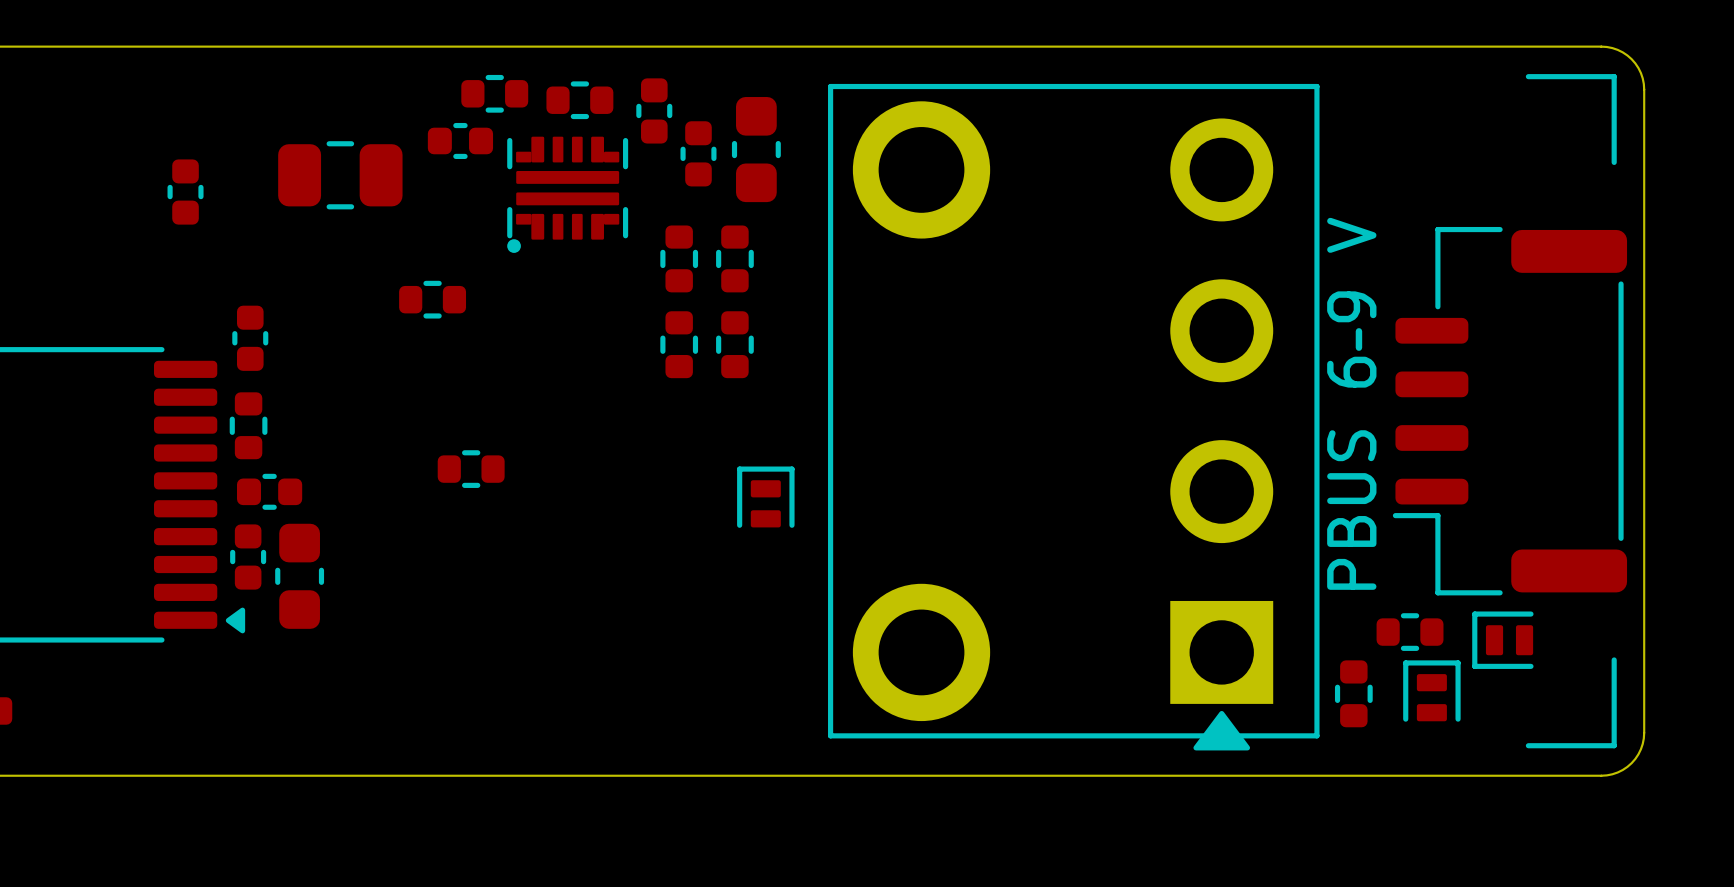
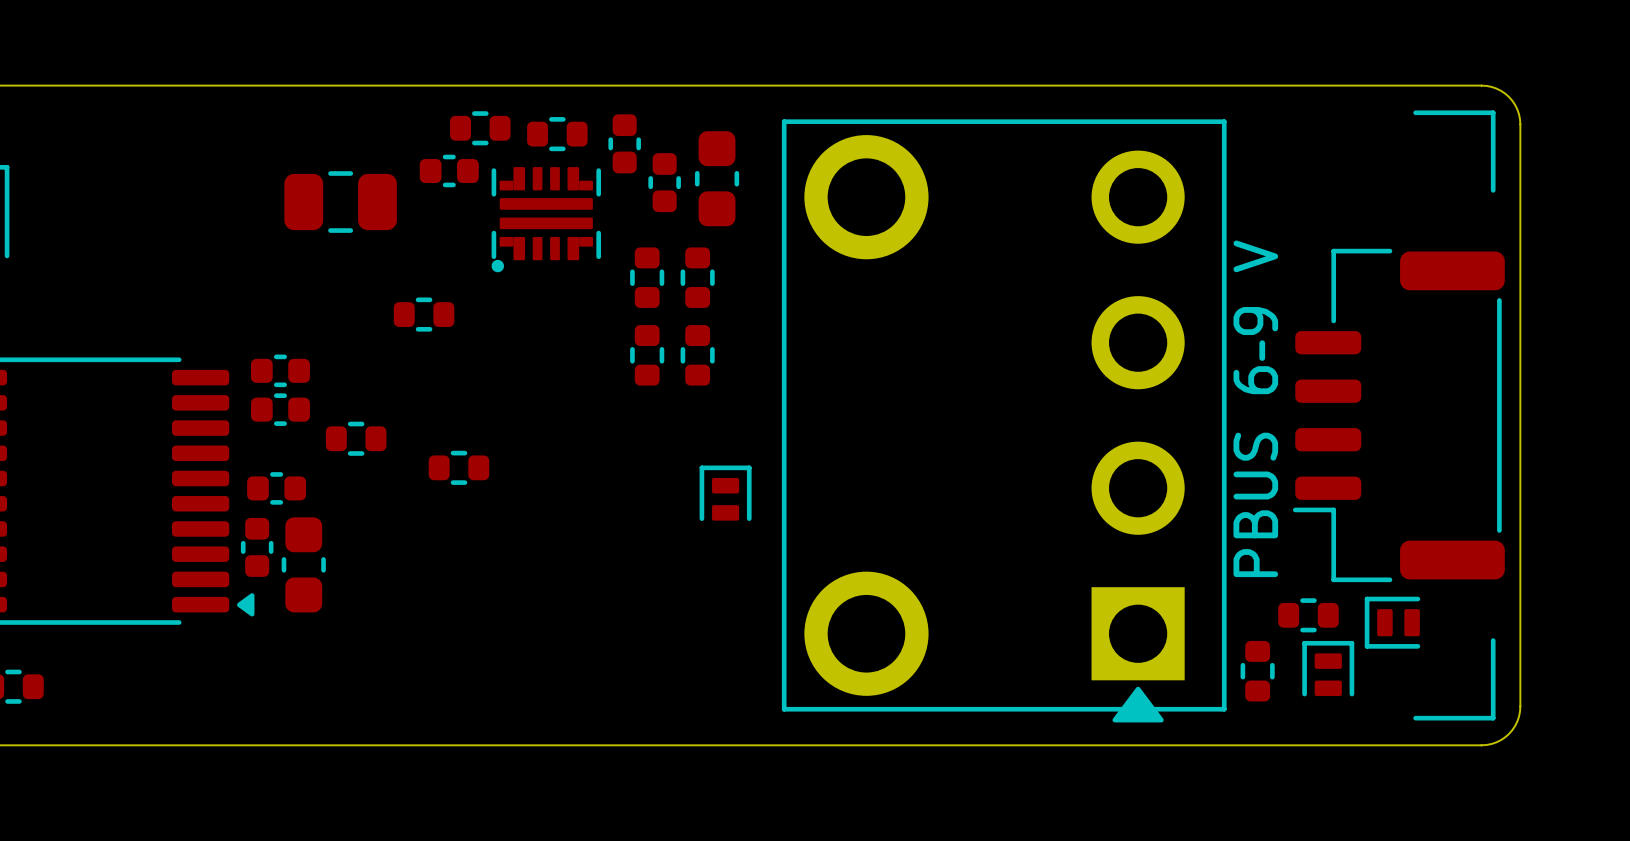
part: (185, 192) -> none
part rotation: 0° (250, 338) -> 90° clockwise (280, 370)
part footprint: [229, 392, 268, 460] -> [250, 393, 310, 426]
part: none -> (356, 438)

